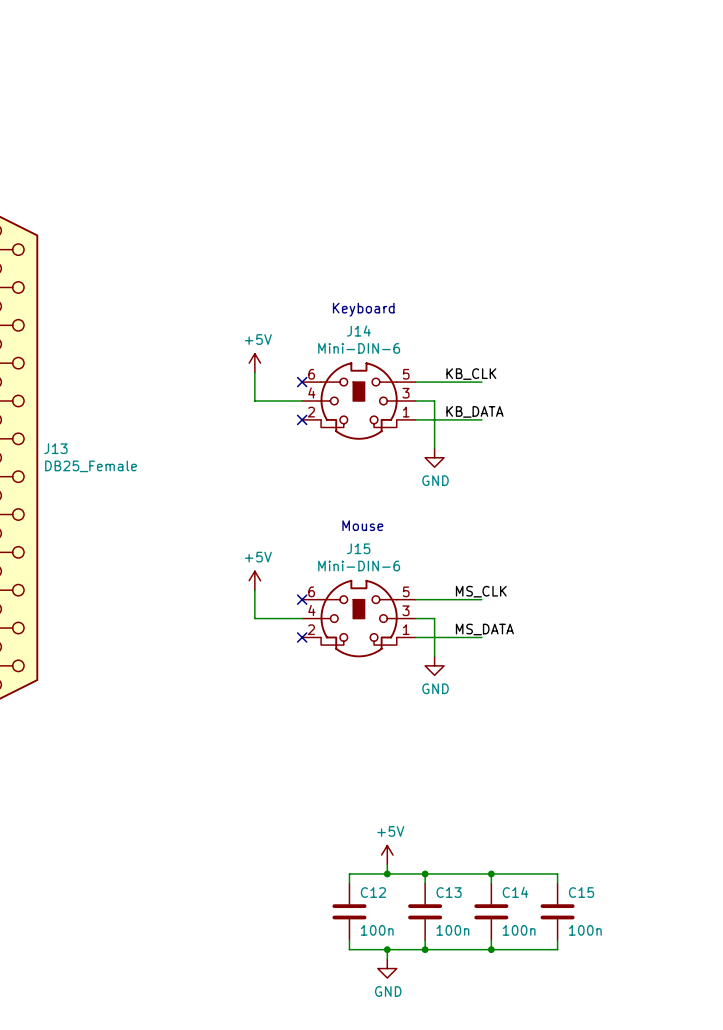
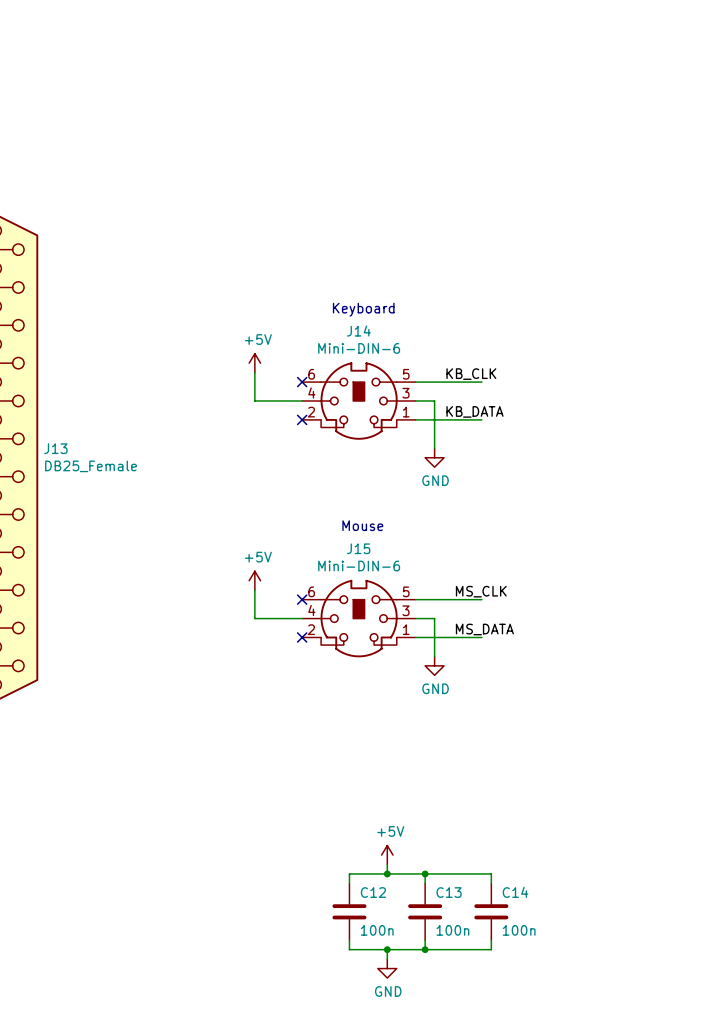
wire: (491, 873) (557, 873) (557, 883) -> none
junction: (491, 873) -> none
C15: 100n (557, 911) -> none
wire: (557, 940) (557, 949) (491, 949) -> none
junction: (491, 949) -> none

